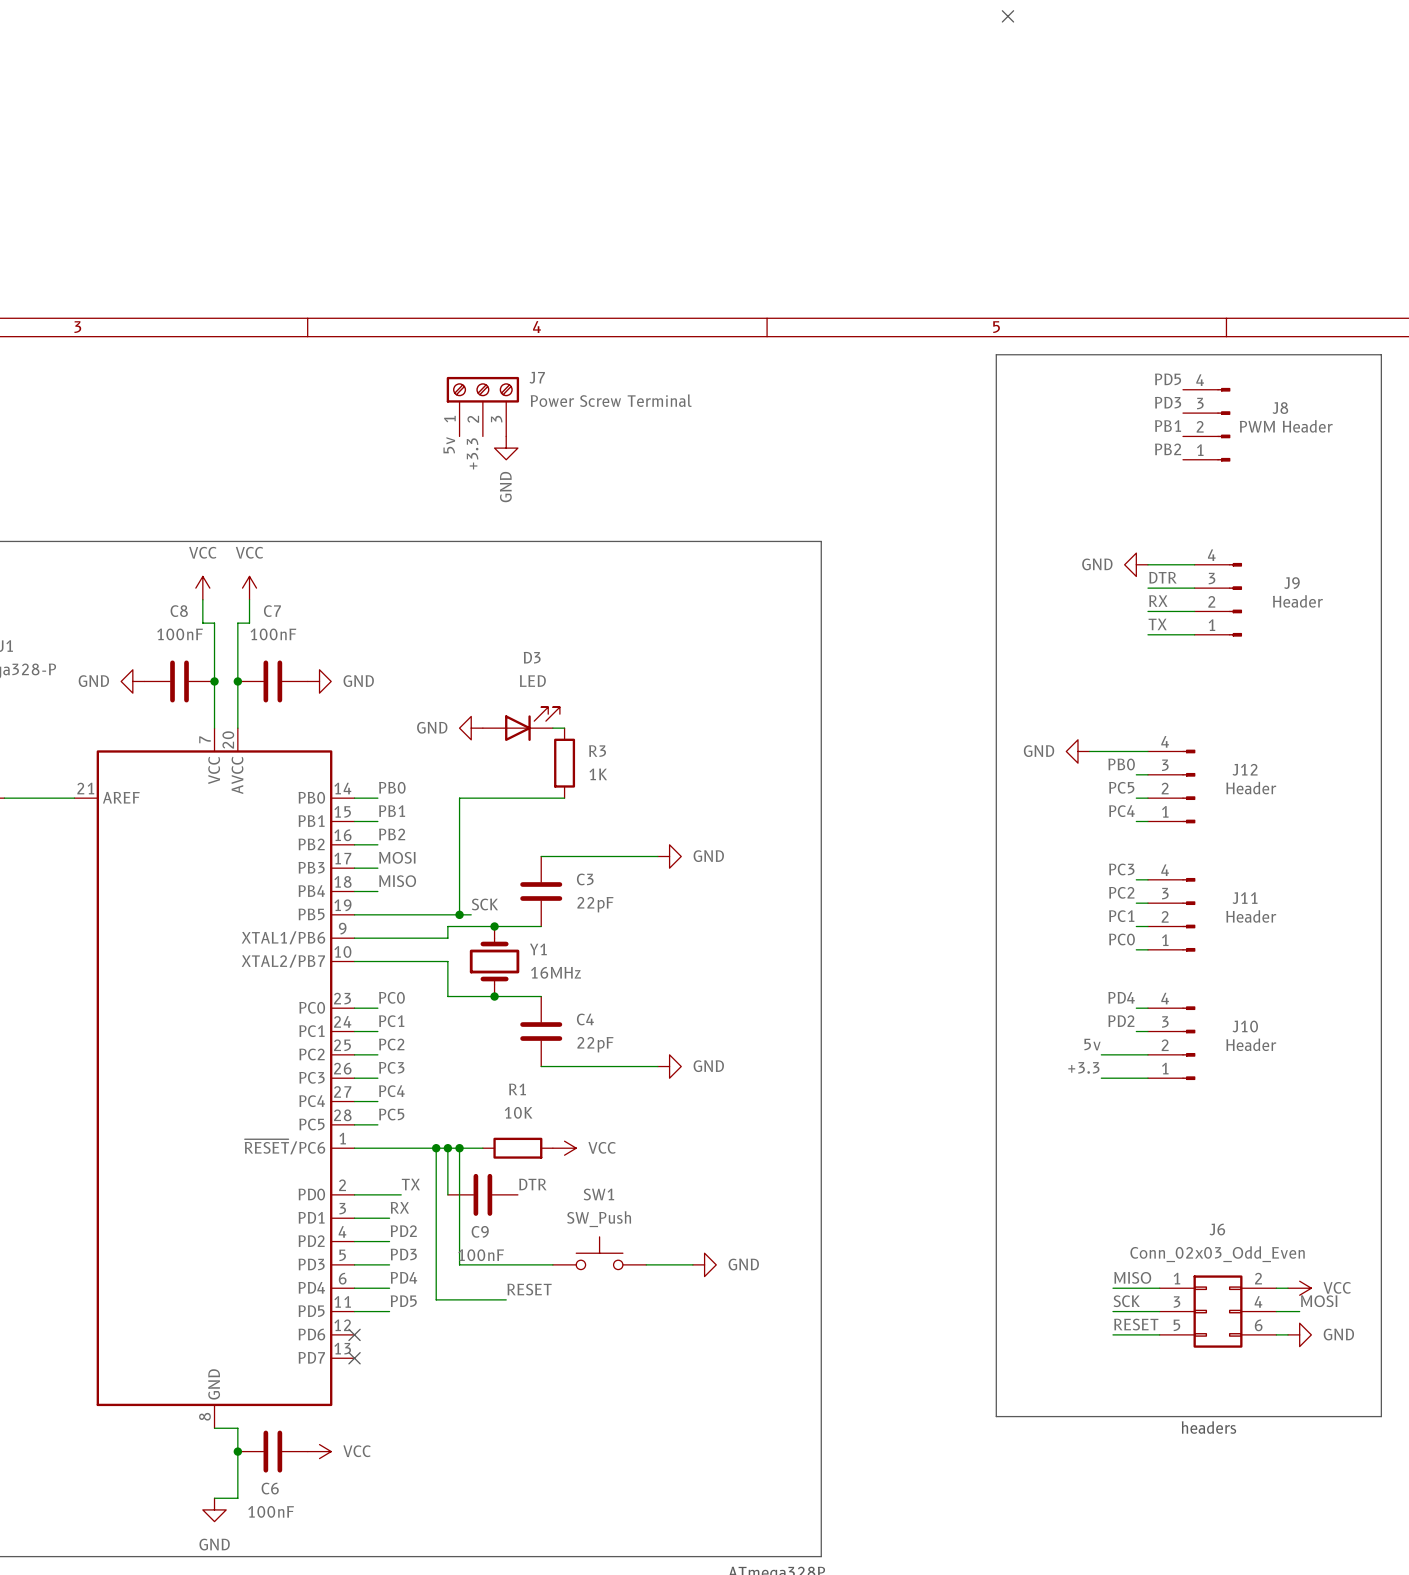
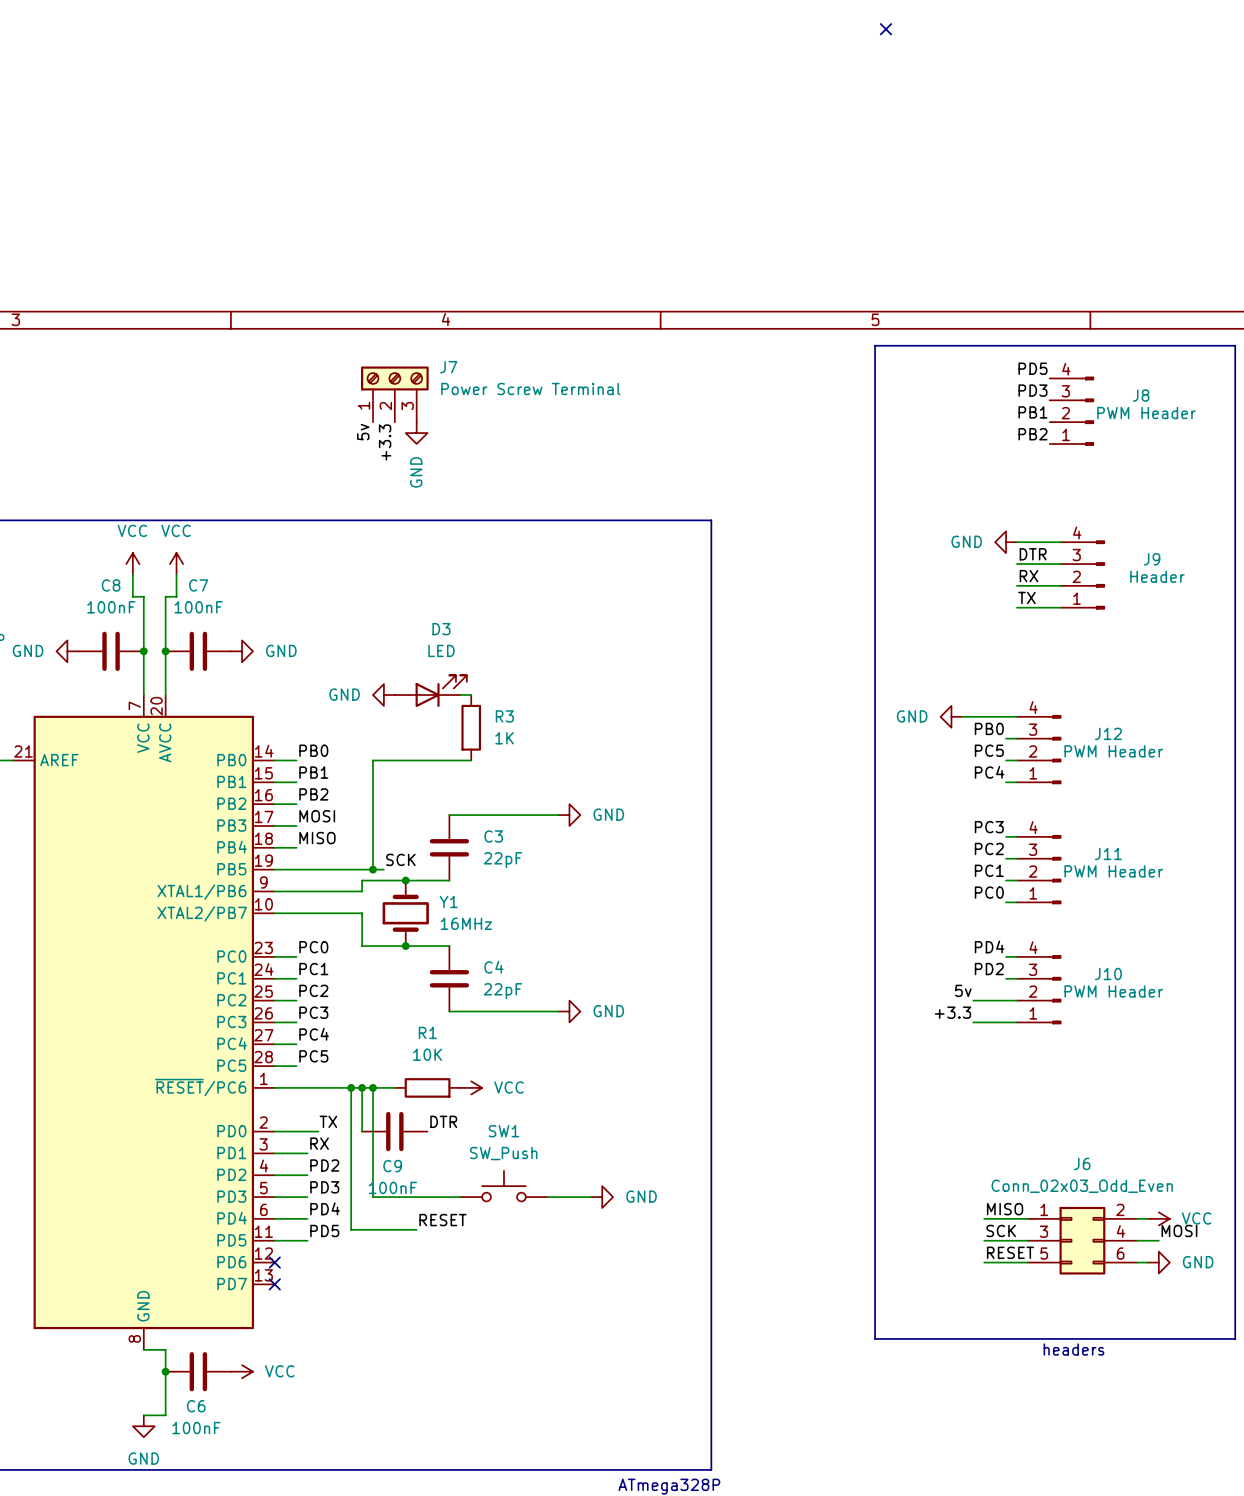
J12 value: Header (1251, 788) -> PWM Header (1113, 751)
J11 value: Header (1251, 916) -> PWM Header (1113, 871)
J10 value: Header (1251, 1044) -> PWM Header (1113, 991)

